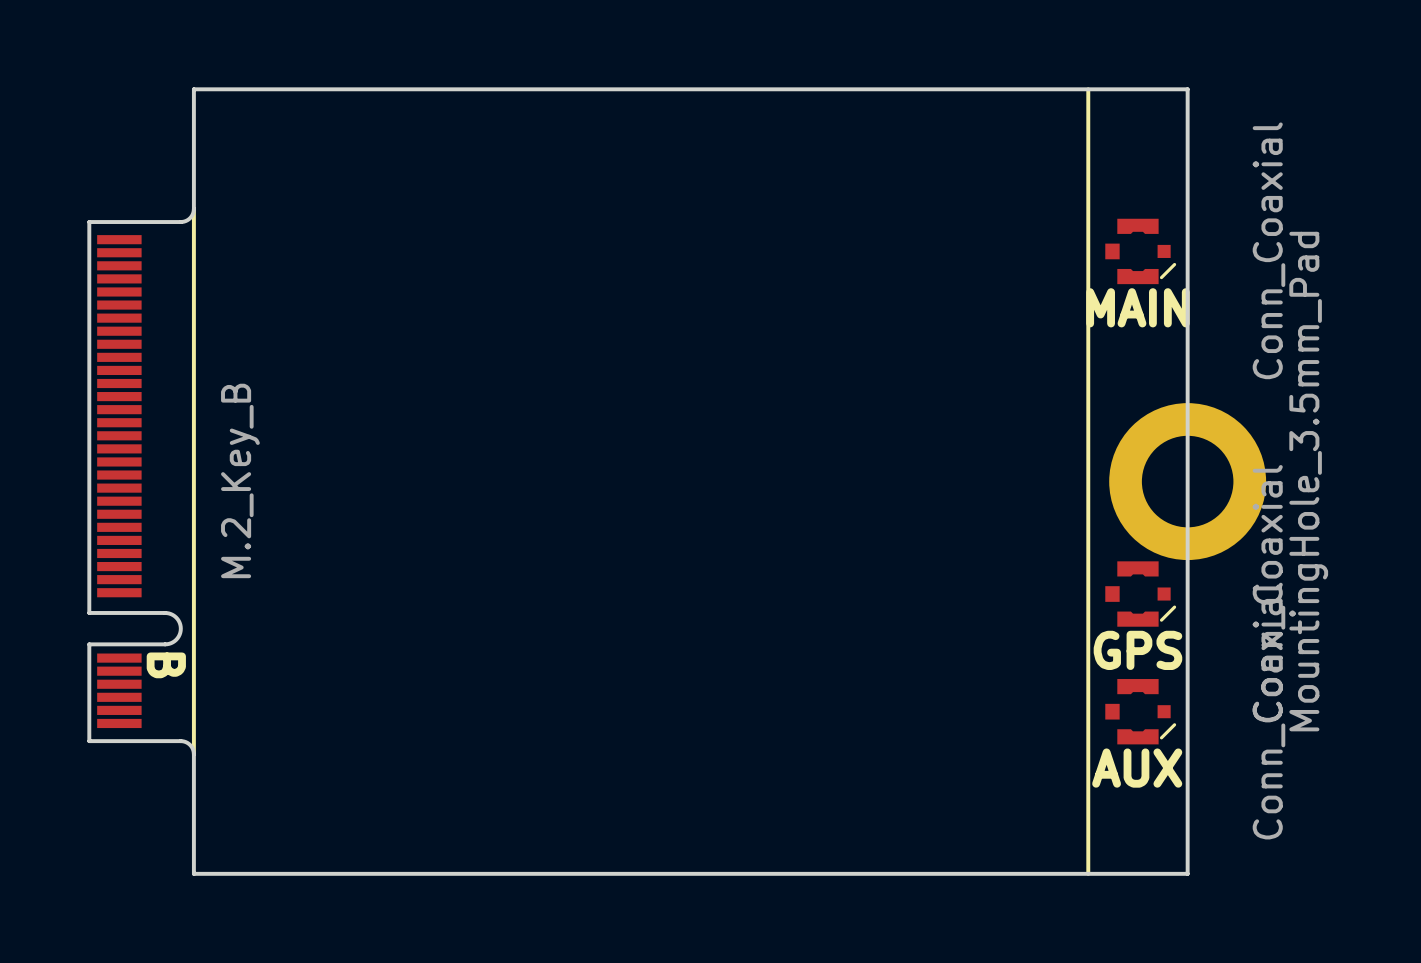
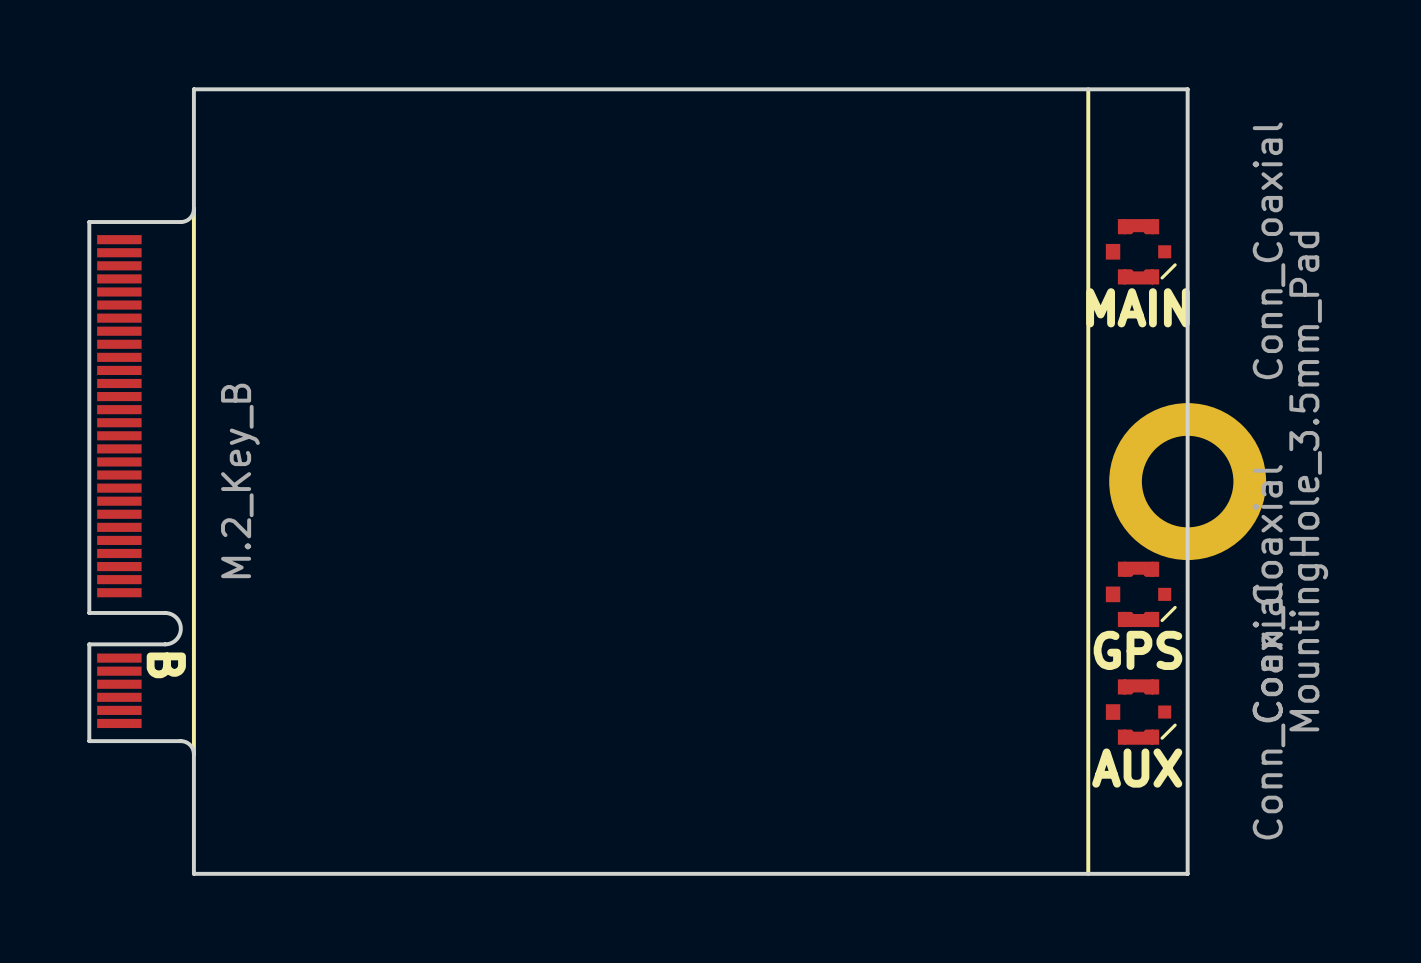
part footprint: [1105, 218, 1177, 285] -> [1105, 219, 1177, 285]
part footprint: [1105, 561, 1177, 627] -> [1105, 561, 1177, 628]
part footprint: [1105, 679, 1177, 745] -> [1105, 679, 1177, 745]

